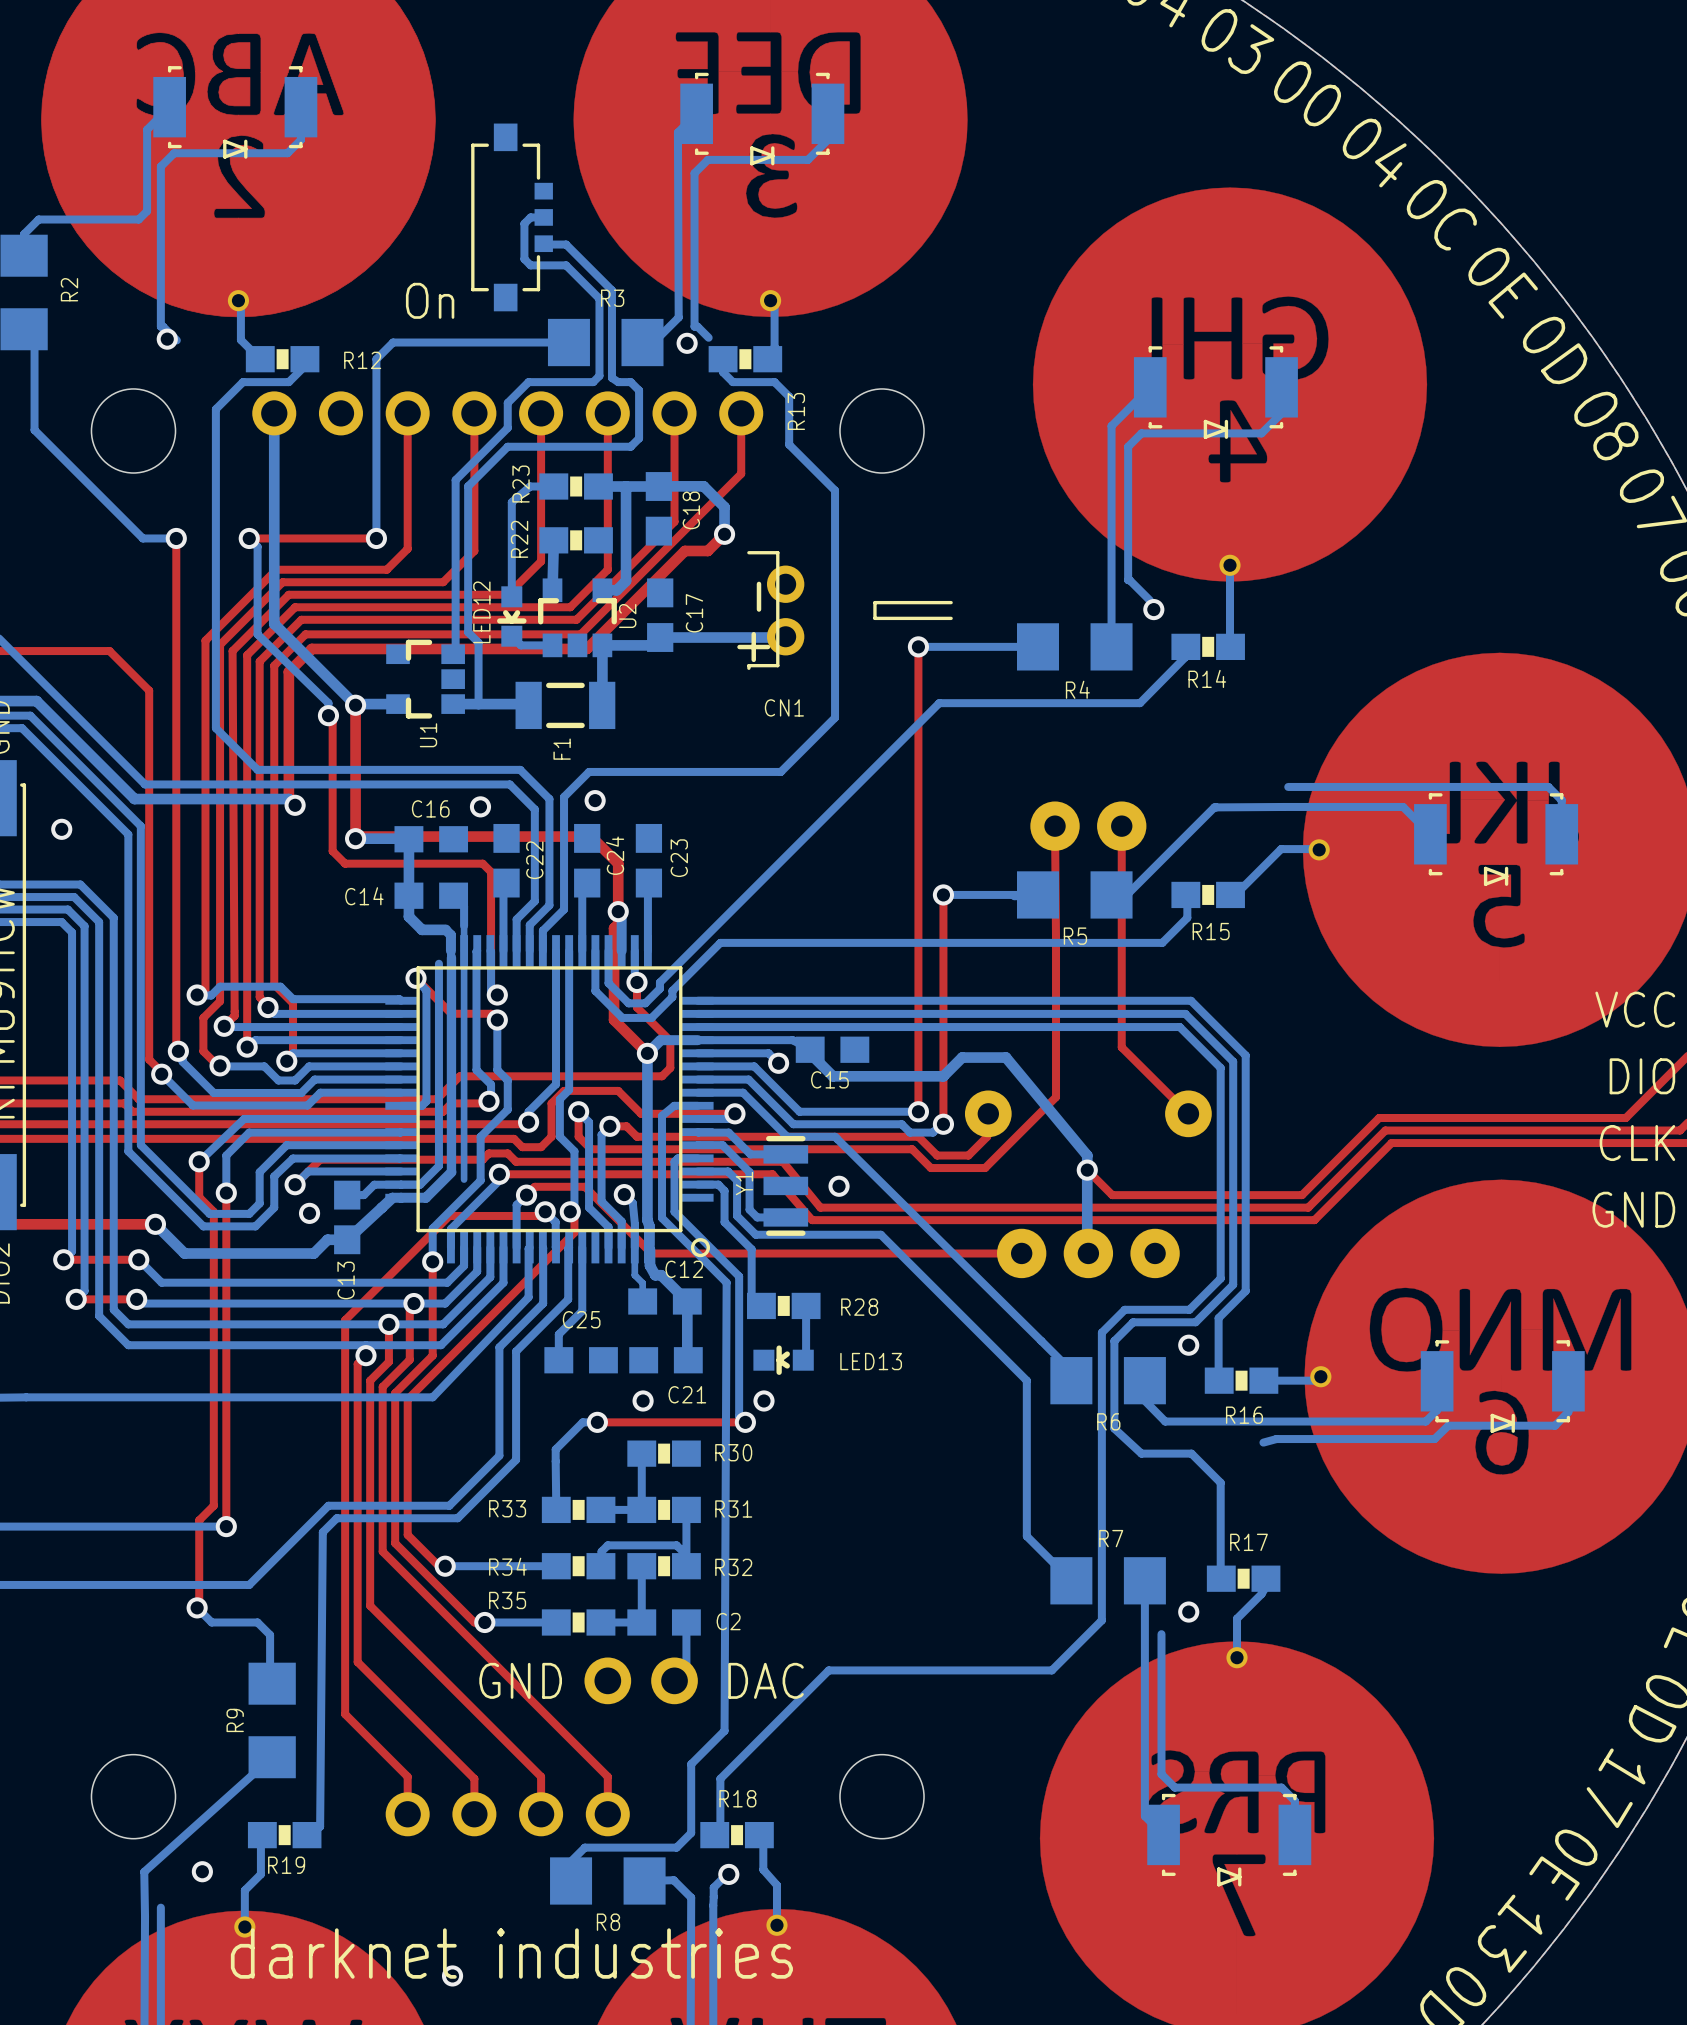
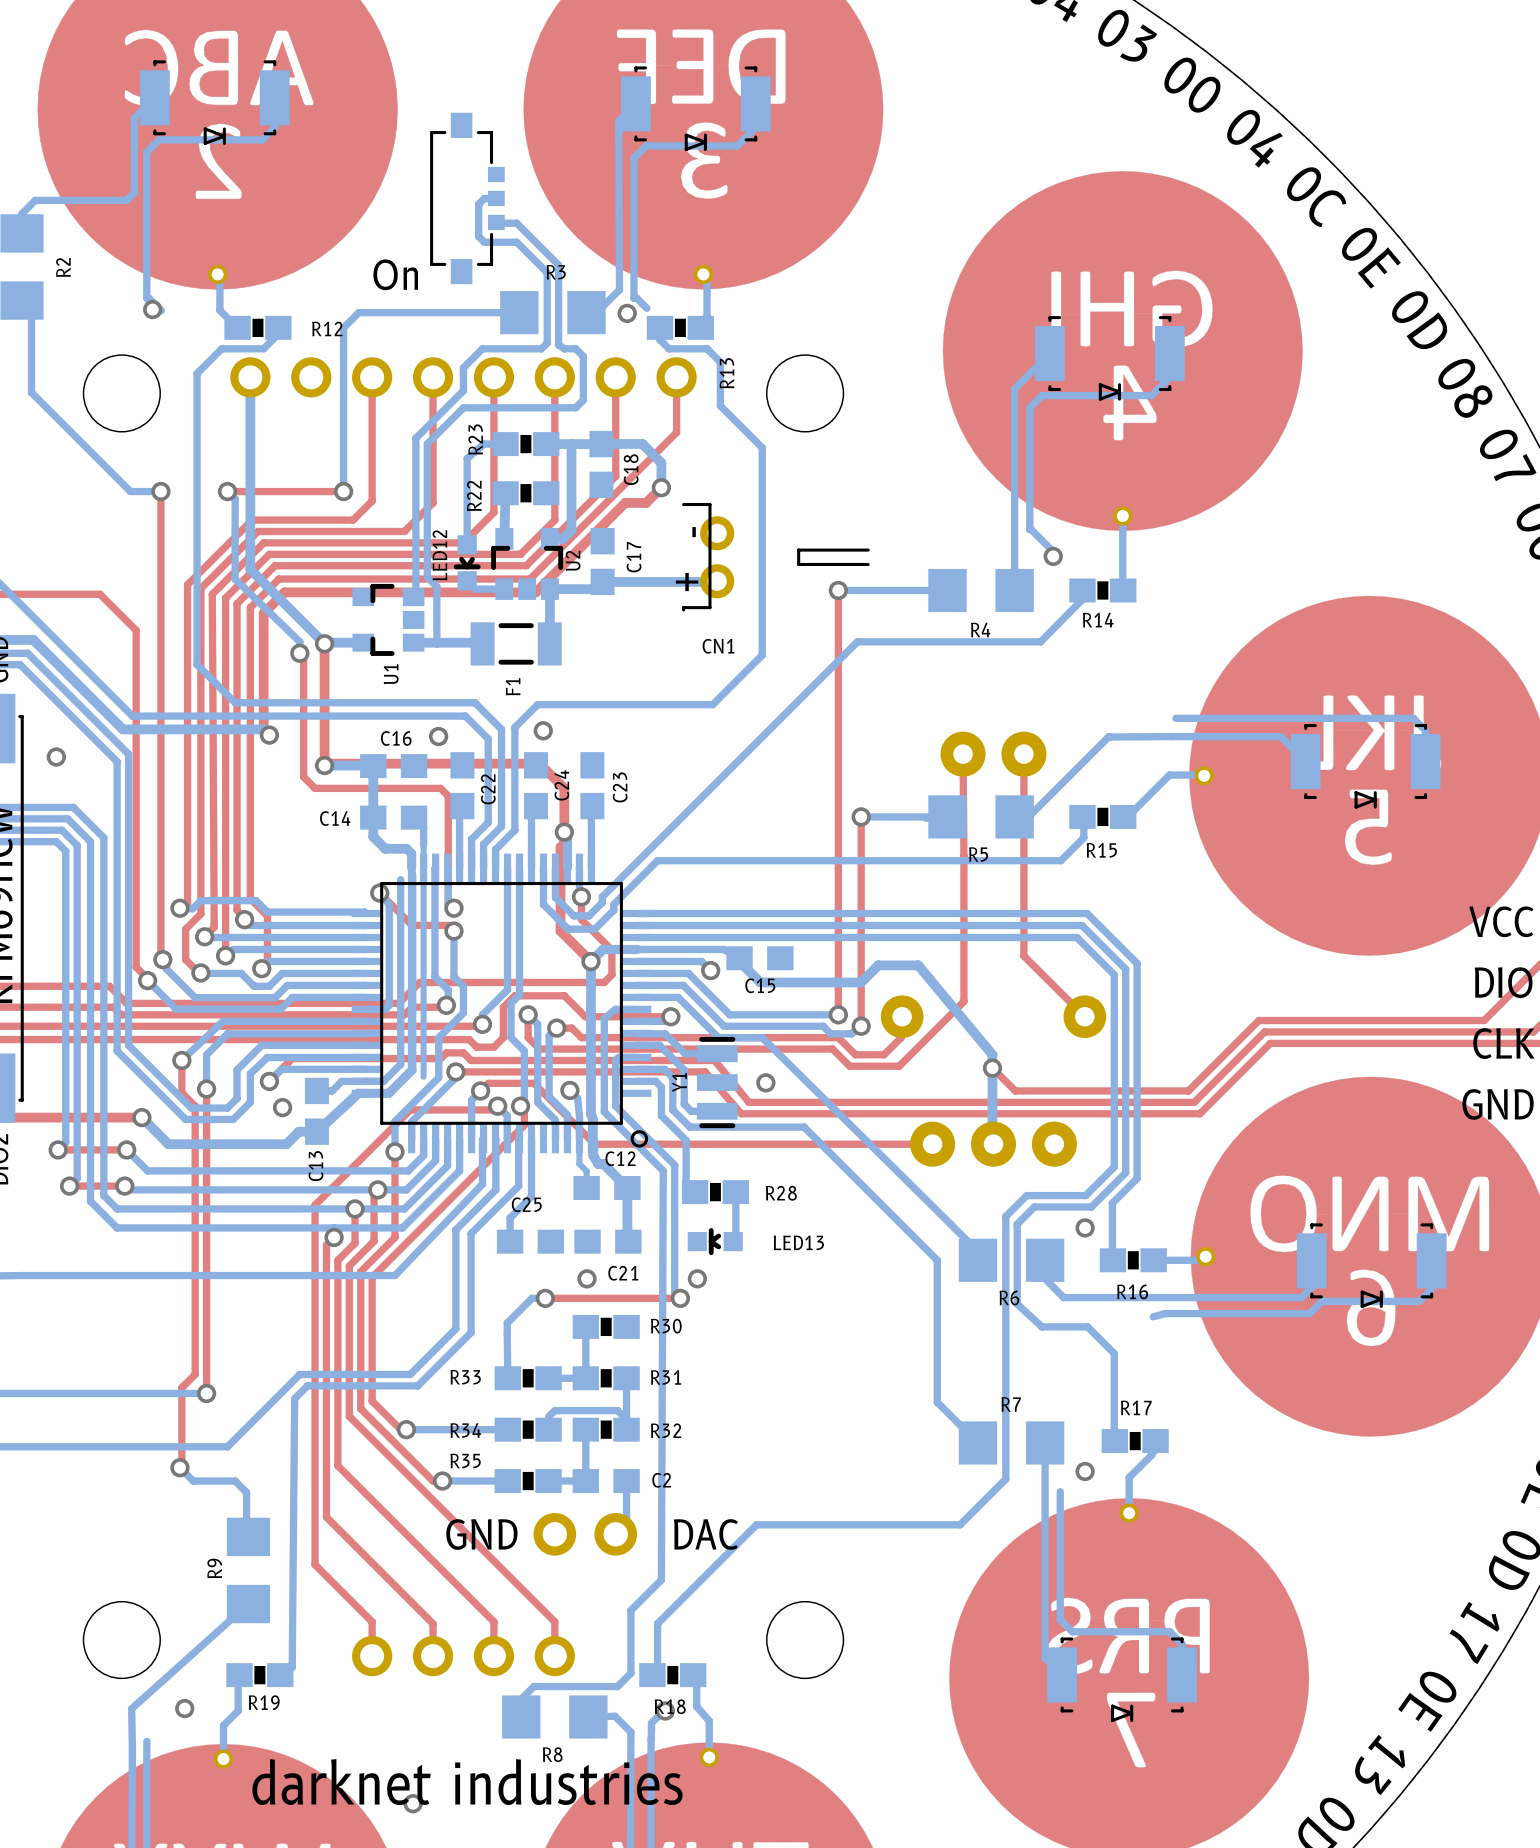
R18 name position: R18 (737, 1798) -> R18 (670, 1706)

